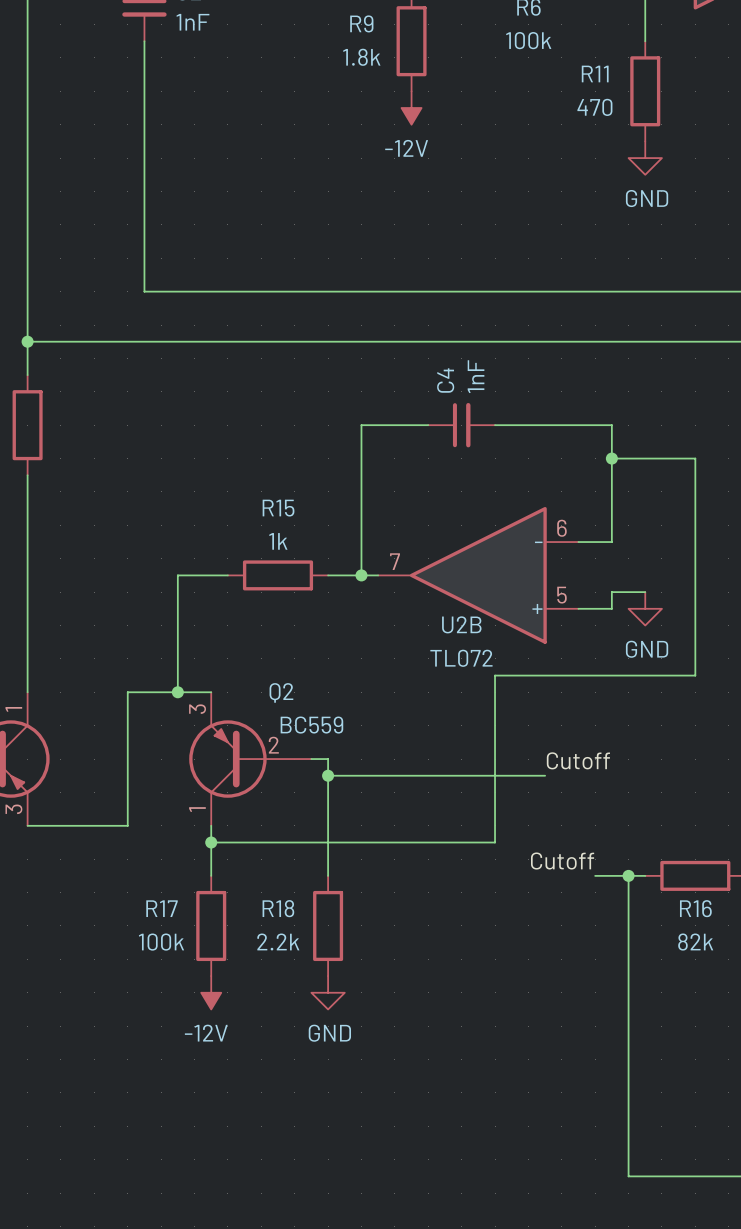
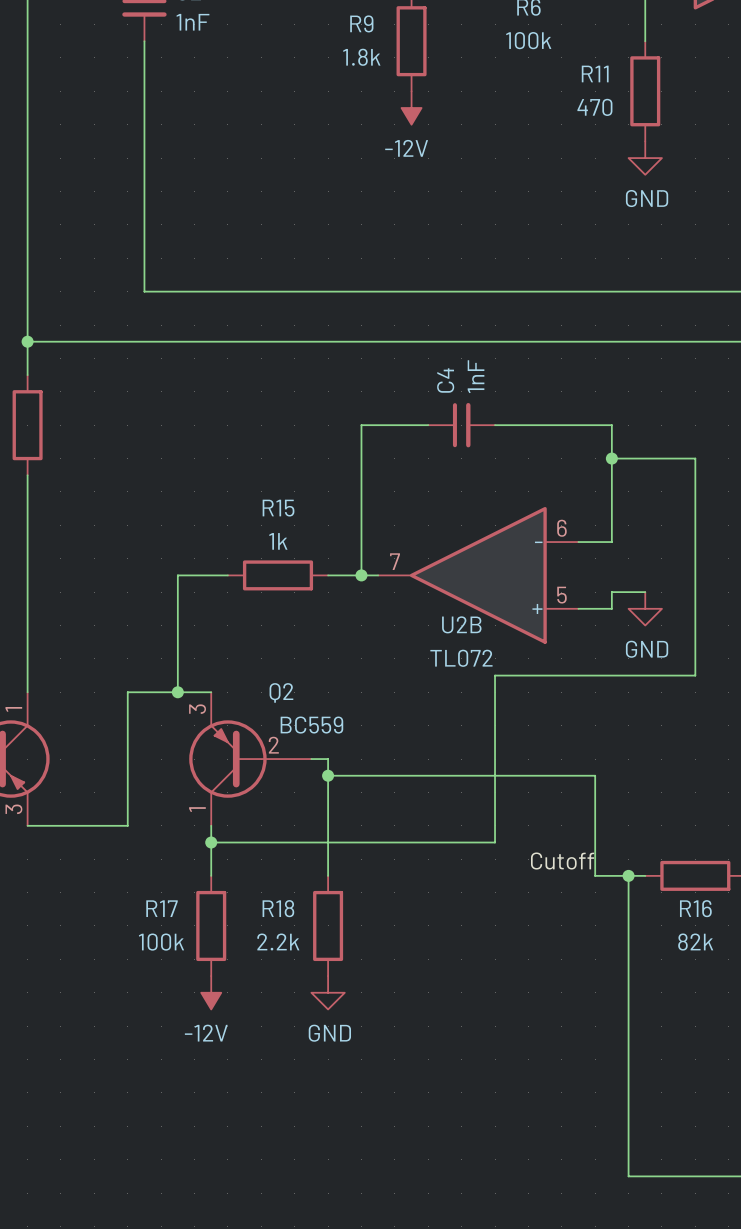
label: Cutoff (578, 760) -> none
wire: none -> (545, 775) (595, 775) (595, 875)

